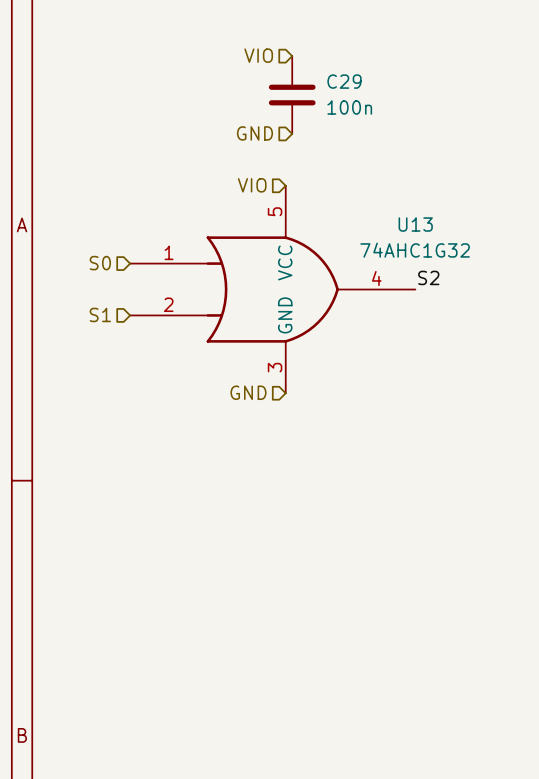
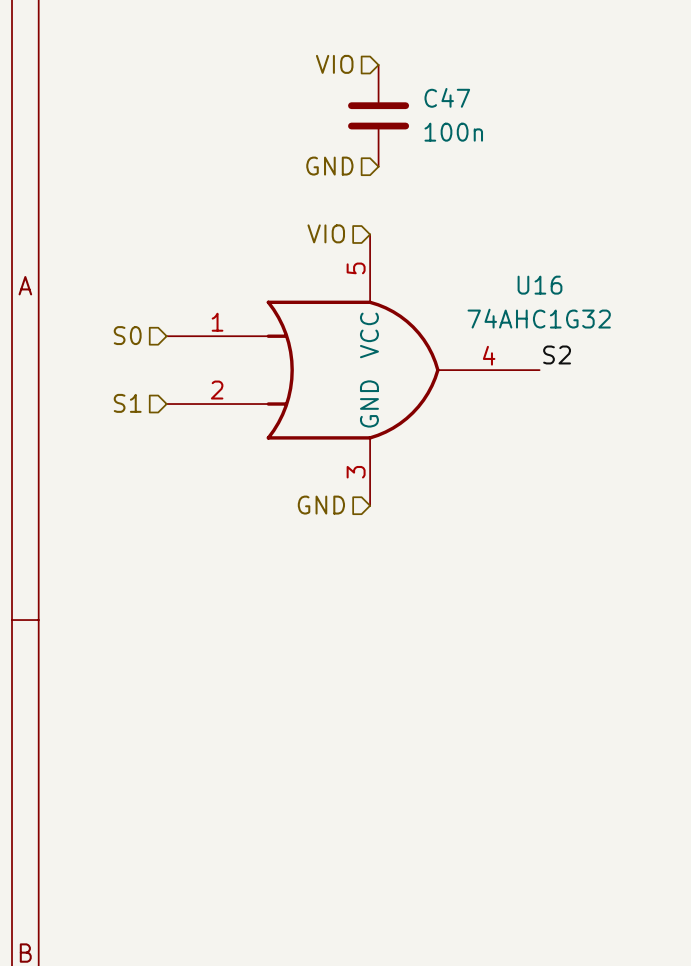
C29 name: C29 (344, 81) -> C47 (447, 97)
U13 name: U13 (415, 224) -> U16 (539, 285)

